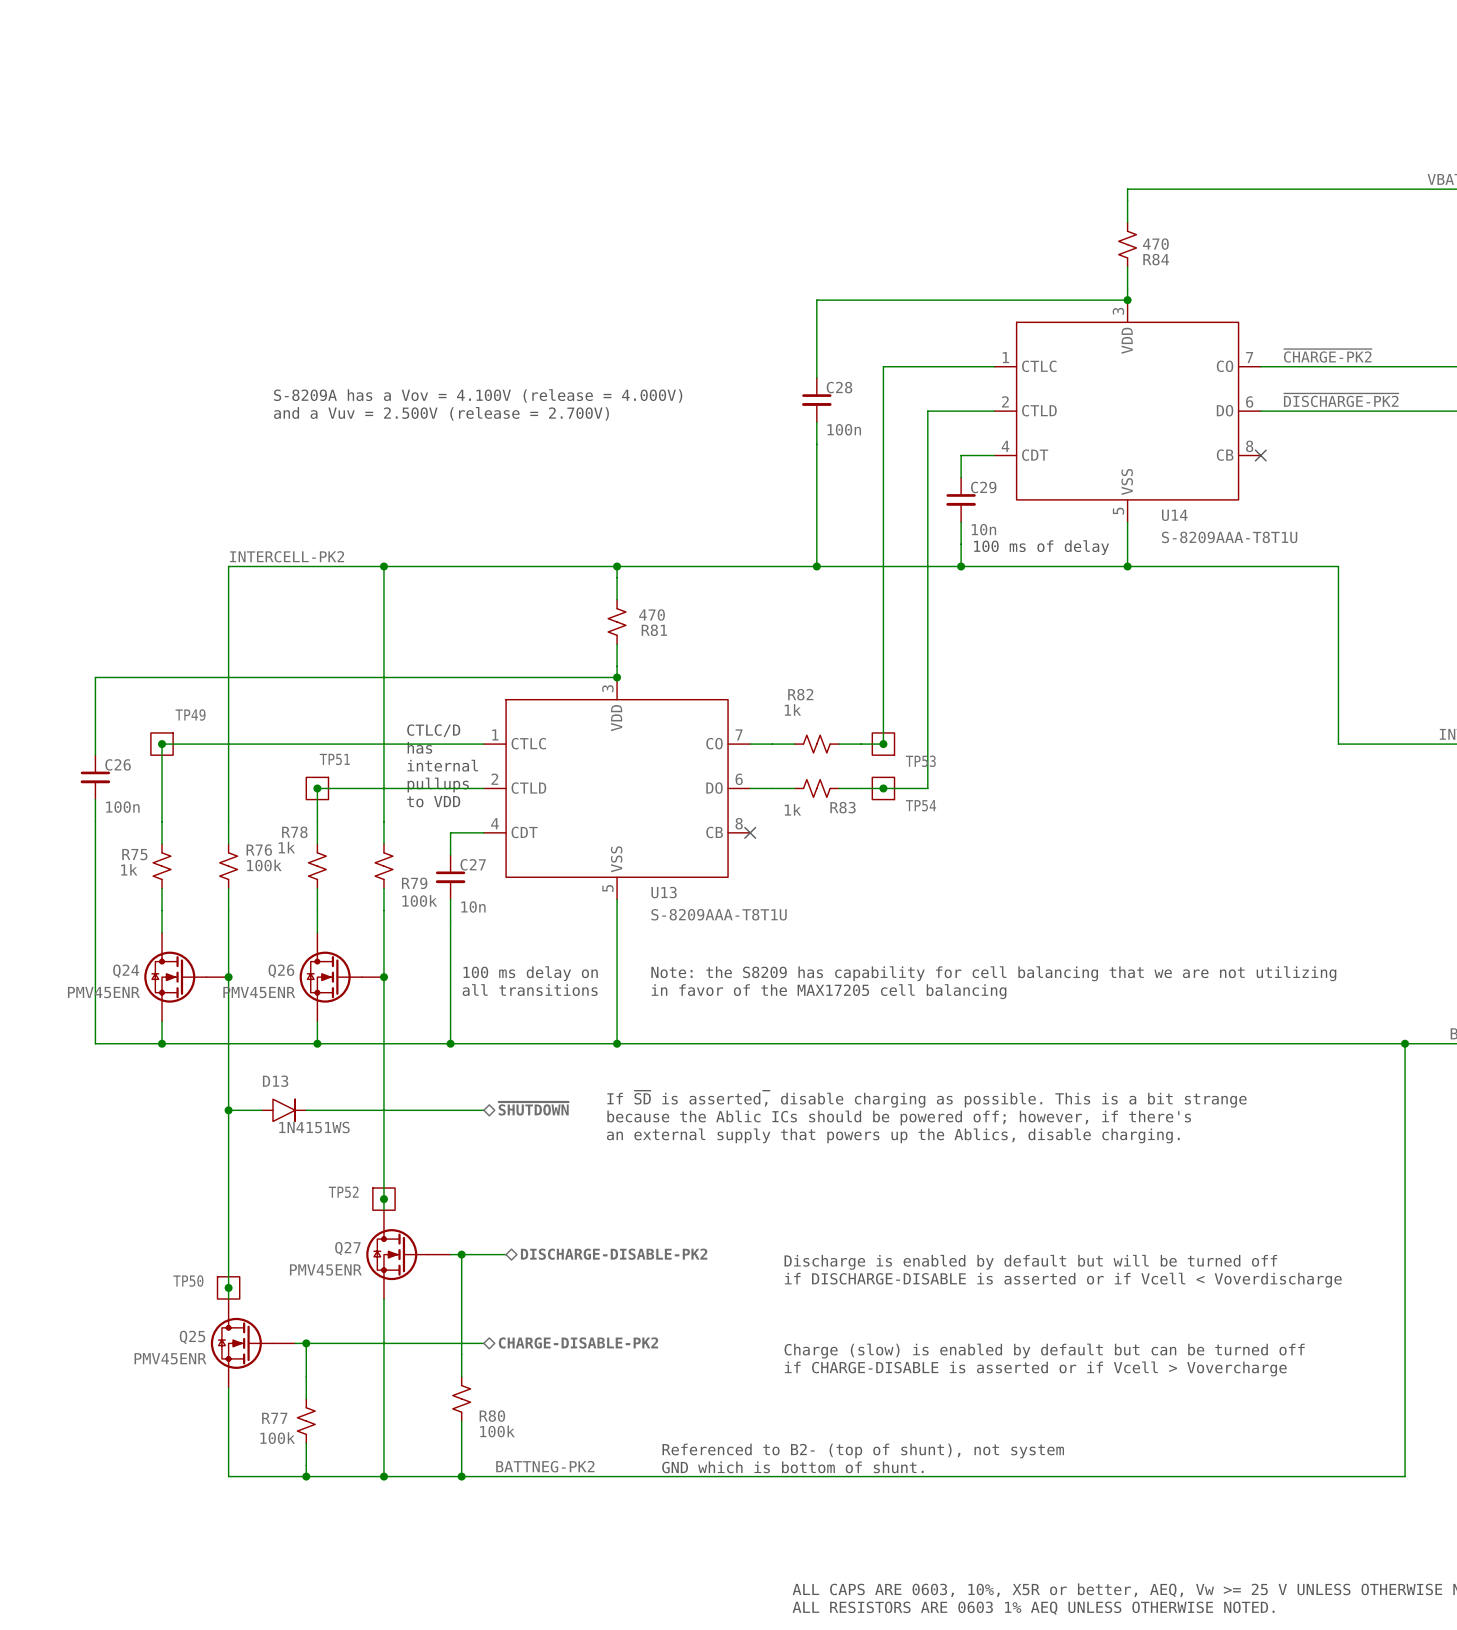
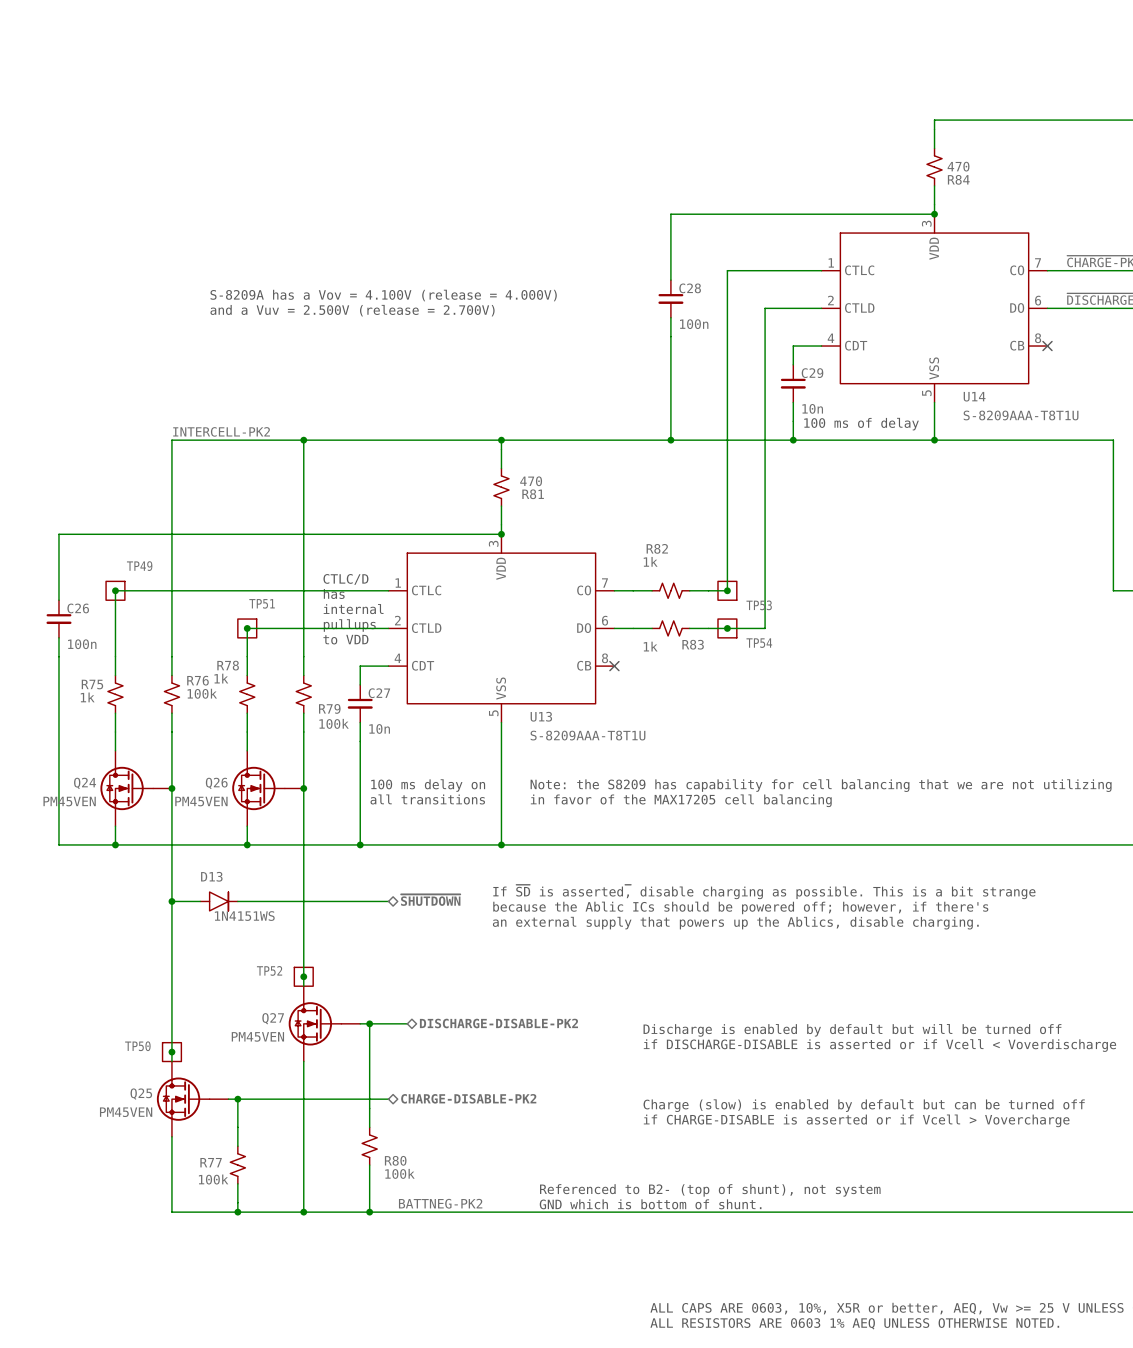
Q24 value: PMV45ENR (103, 992) -> PM45VEN (69, 801)
Q26 value: PMV45ENR (259, 992) -> PM45VEN (201, 801)
Q27 value: PMV45ENR (325, 1270) -> PM45VEN (257, 1036)
Q25 value: PMV45ENR (170, 1358) -> PM45VEN (126, 1112)

